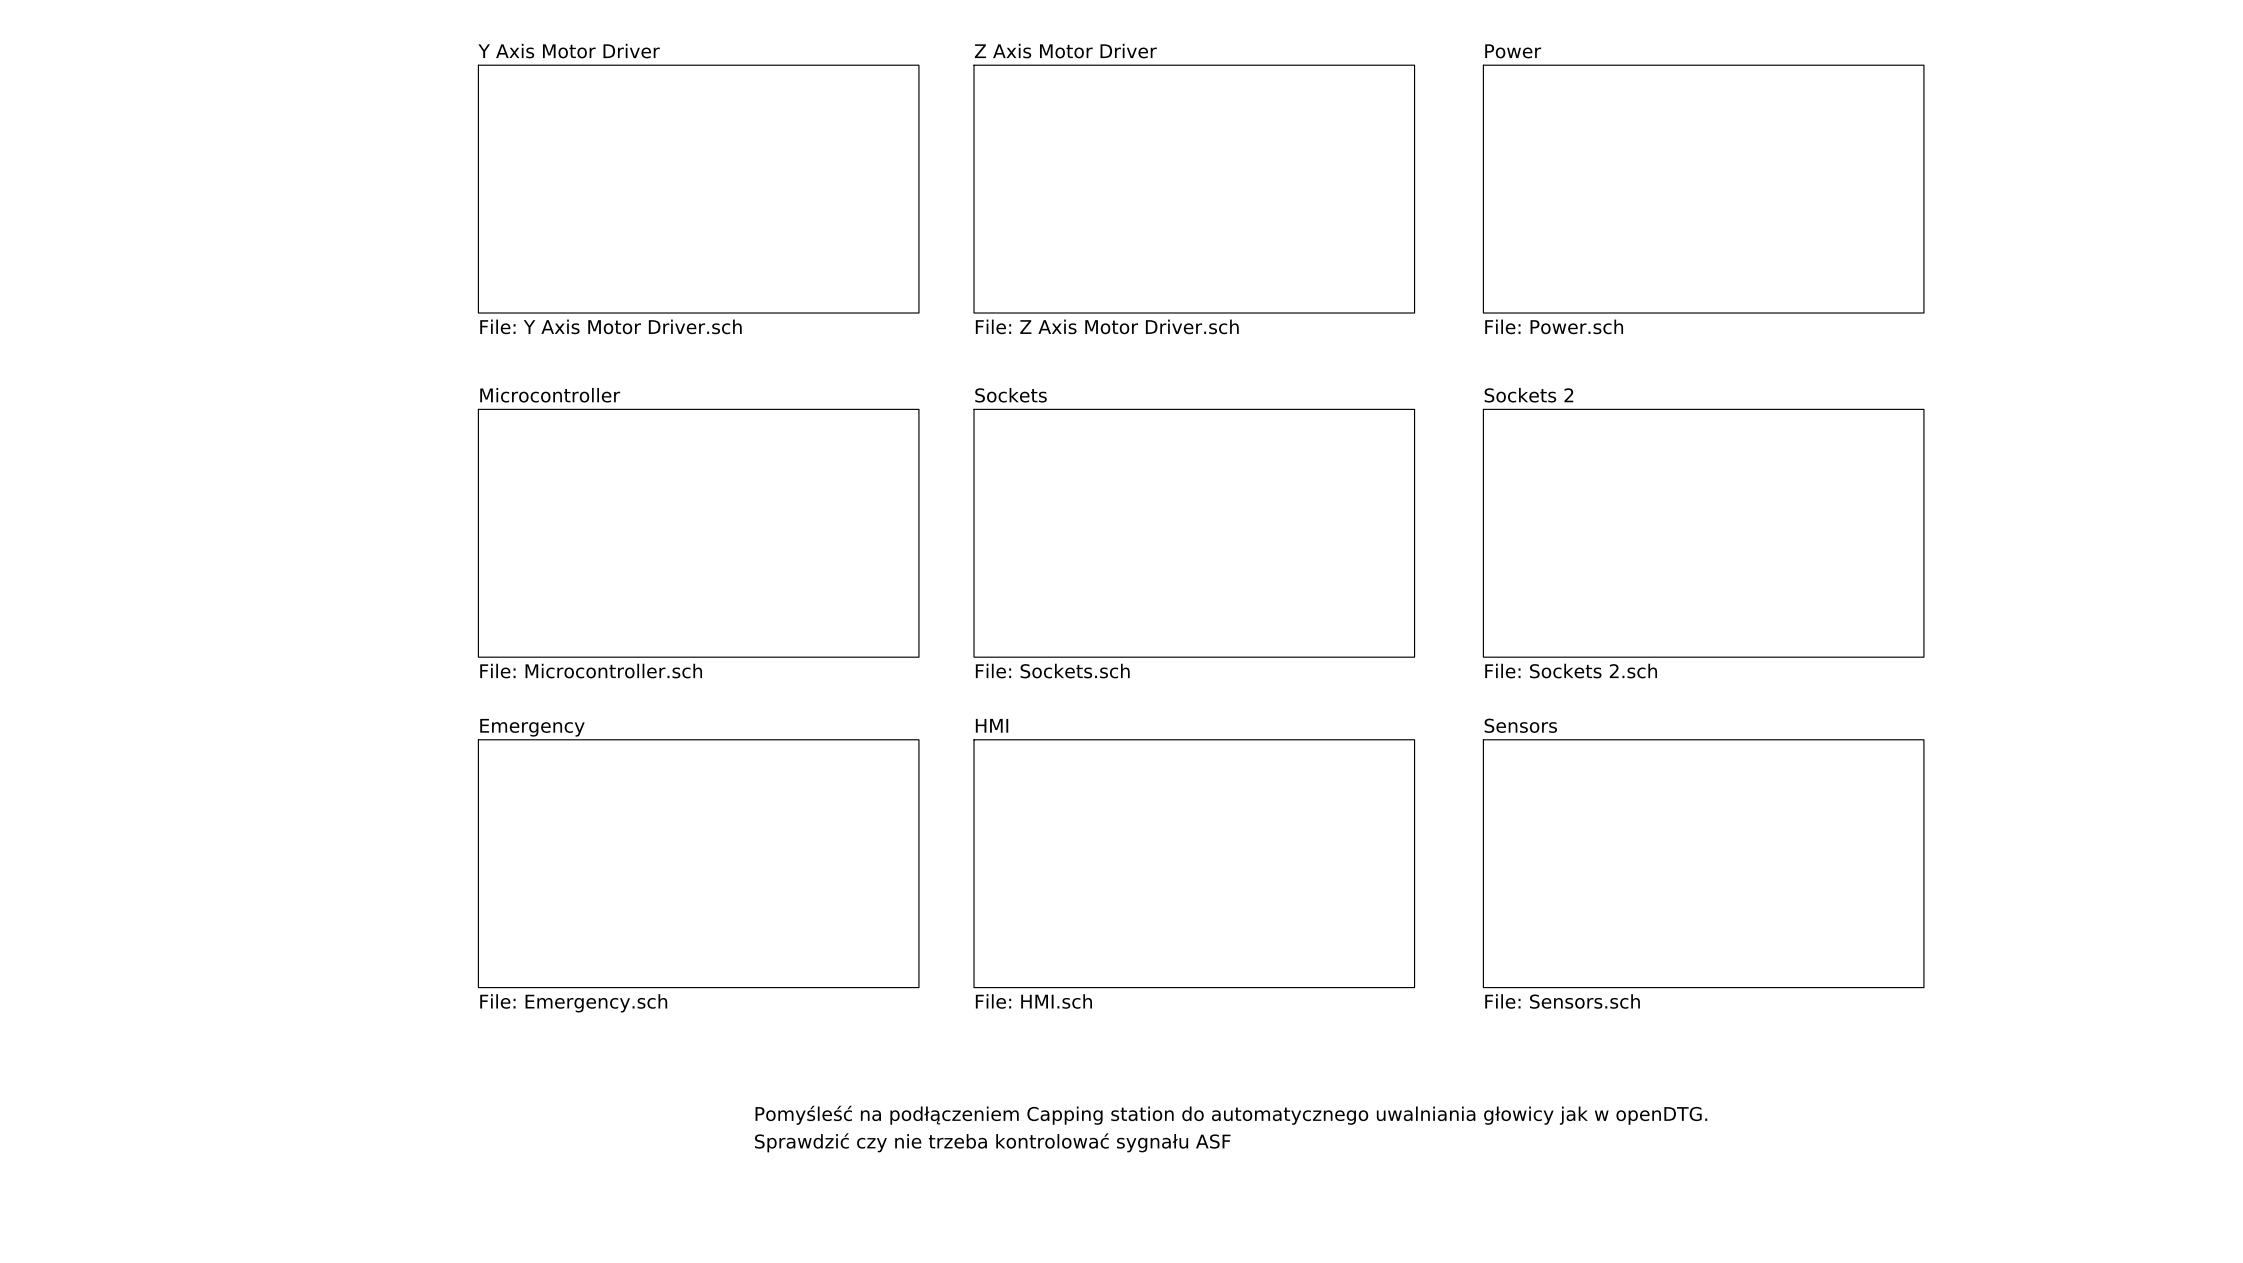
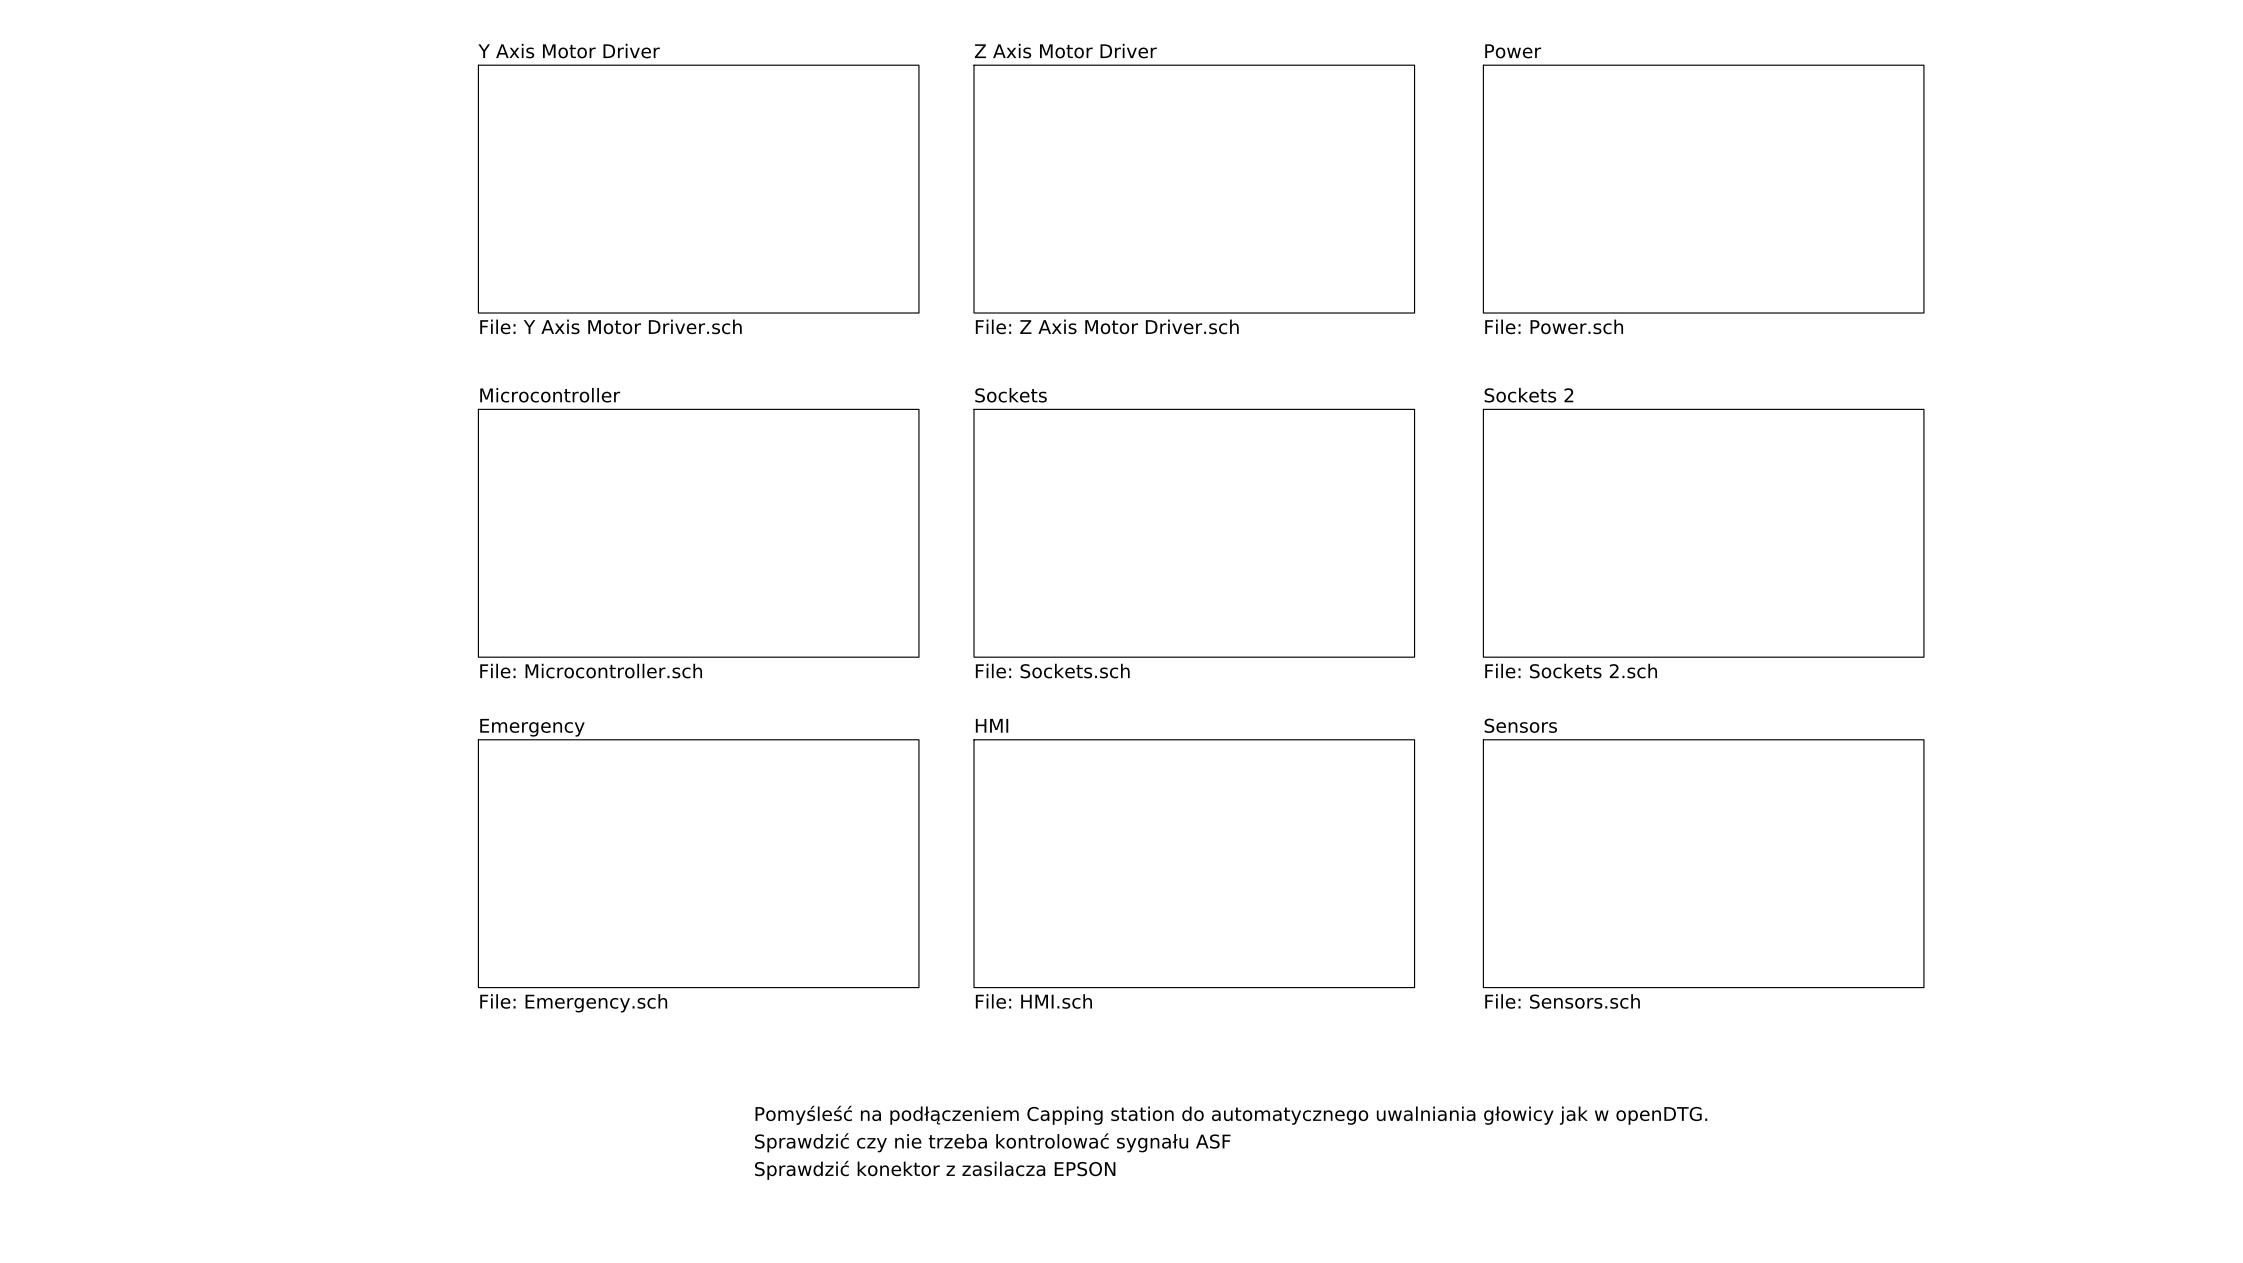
text: none -> Sprawdzić konektor z zasilacza EPSON (935, 1170)

